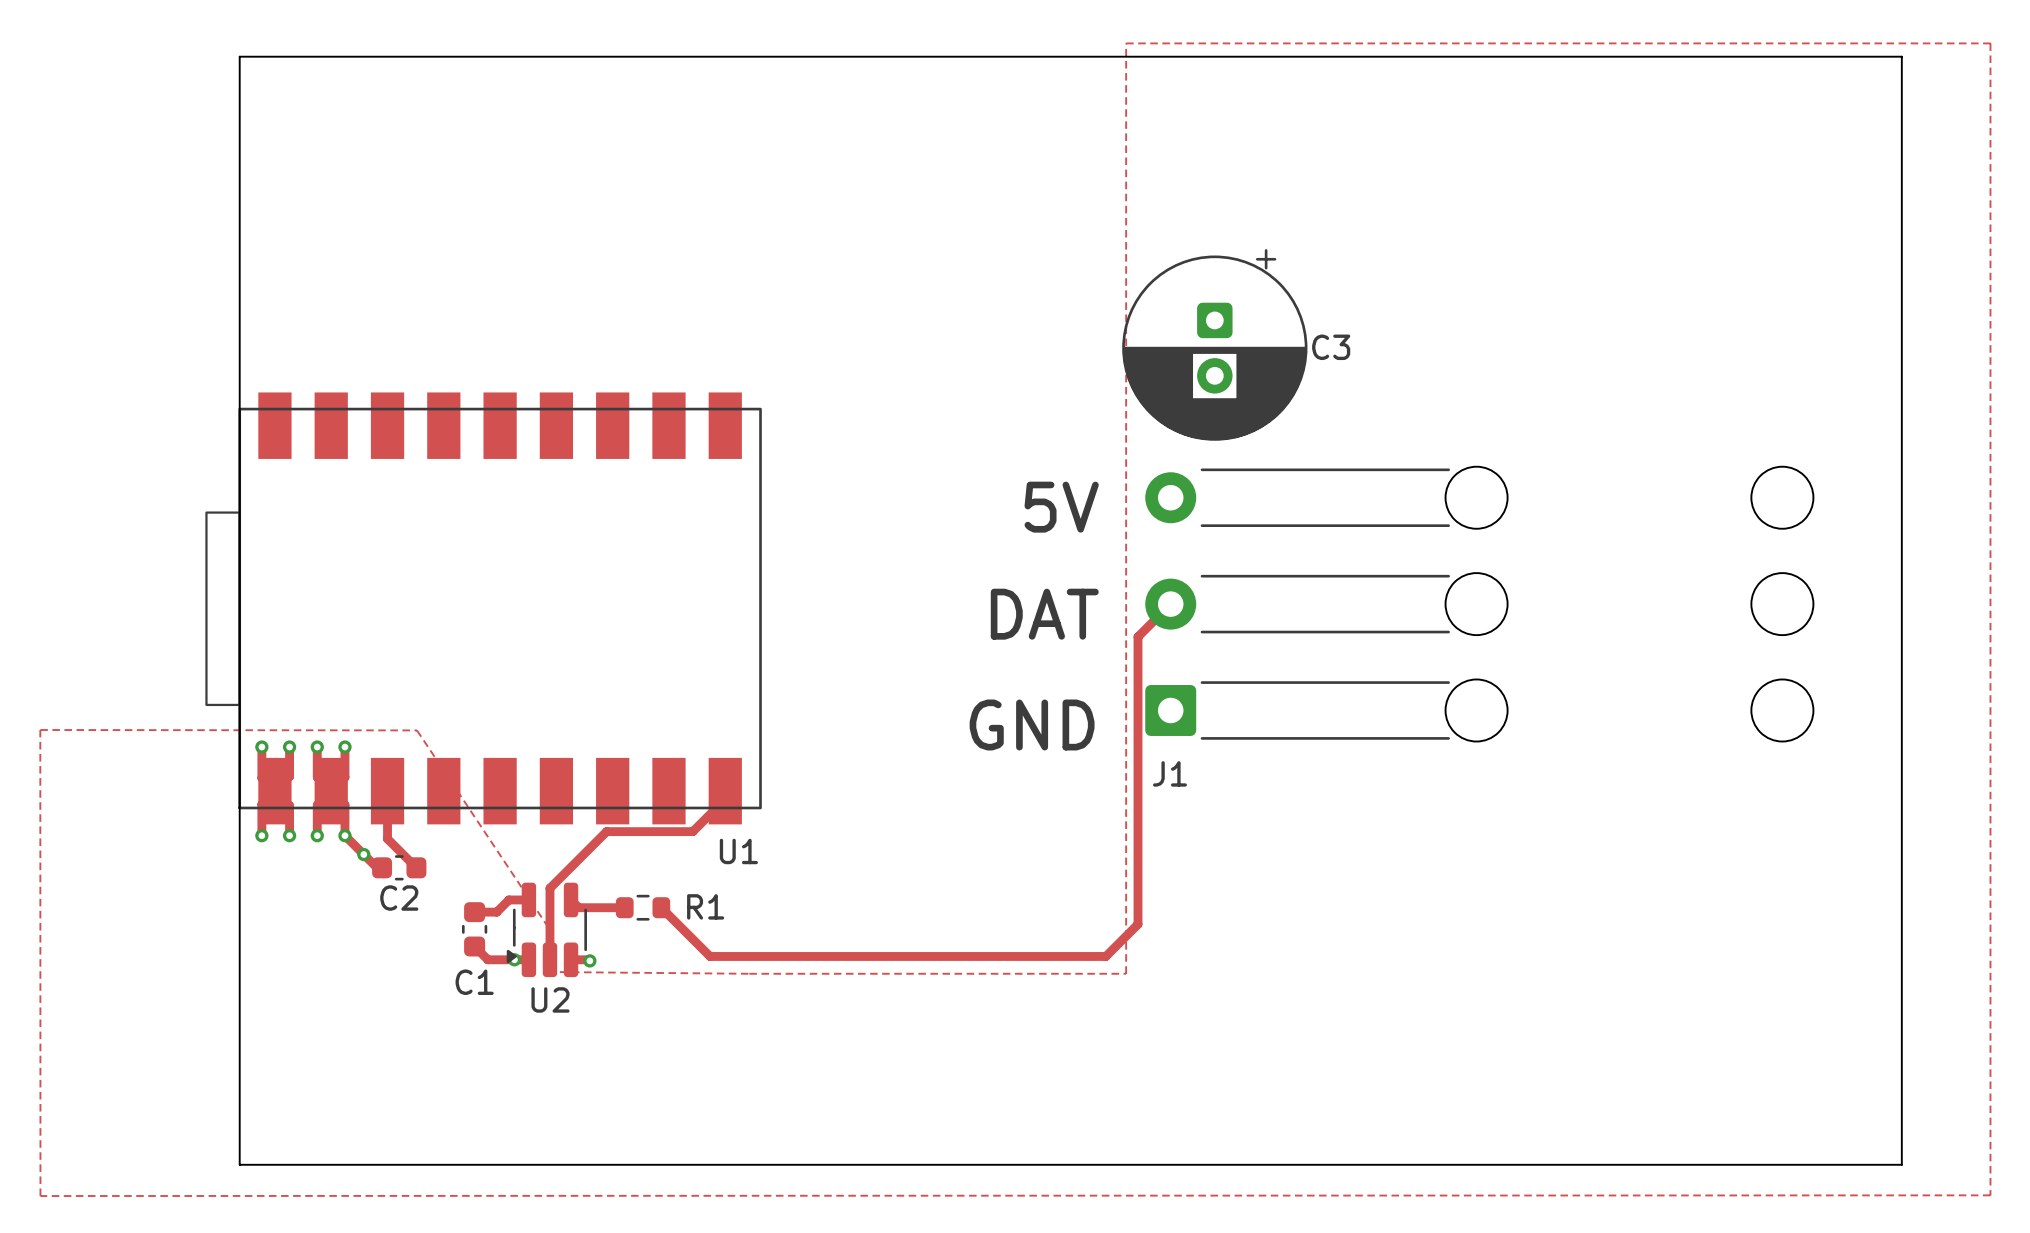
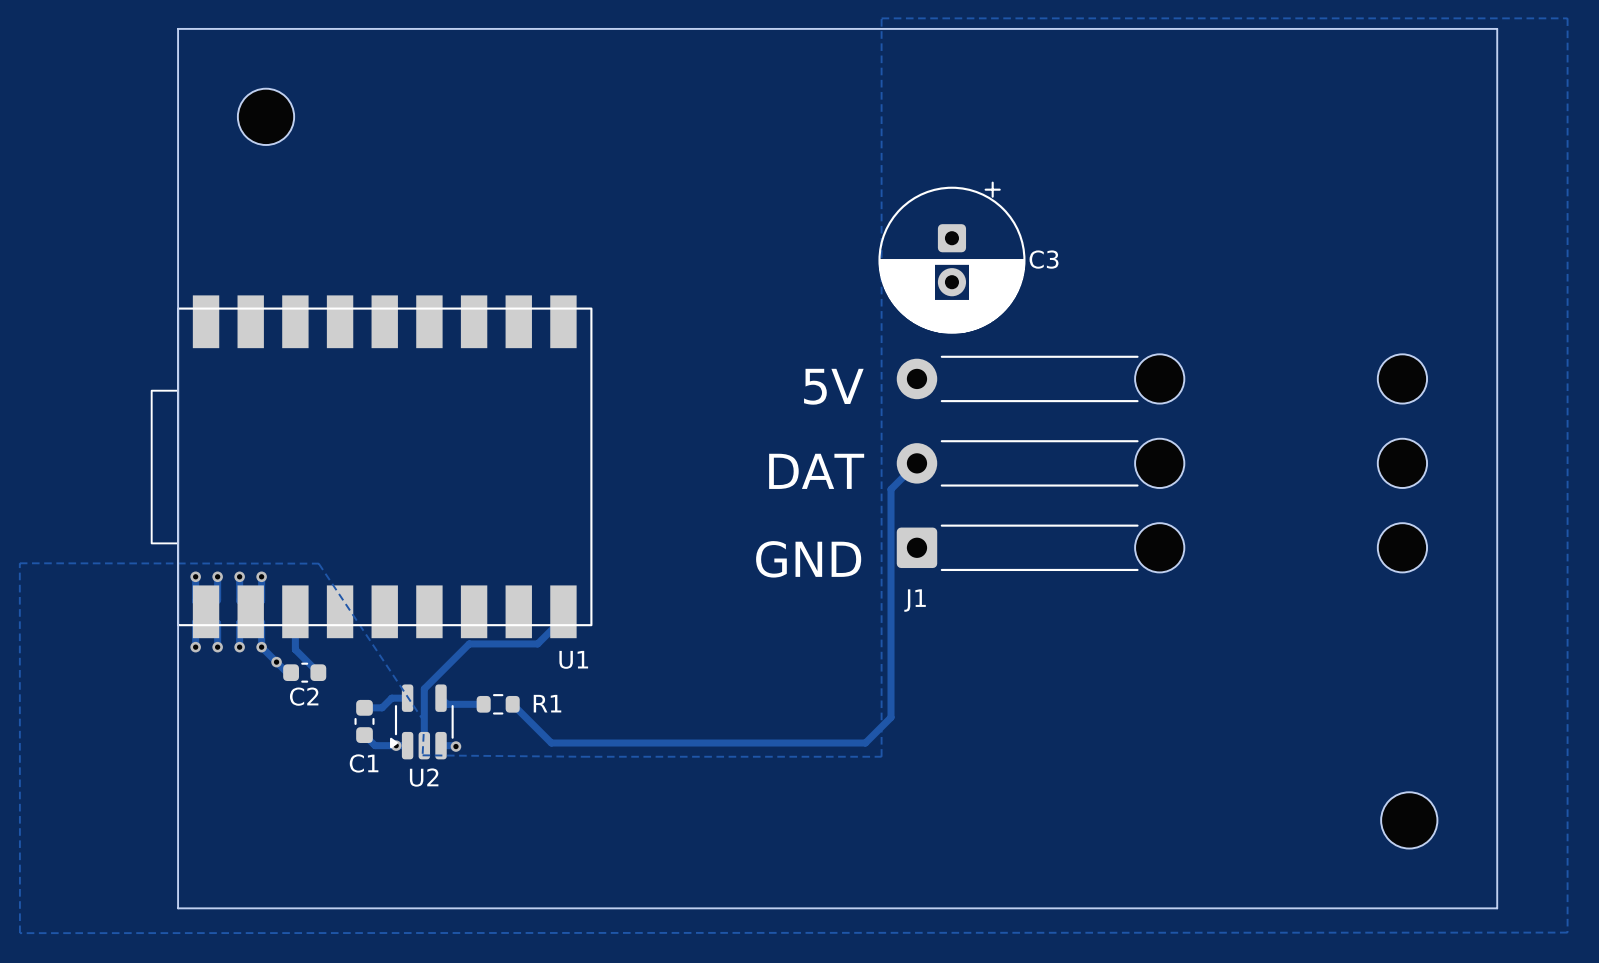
part: none -> (266, 116)
part: none -> (1409, 820)

